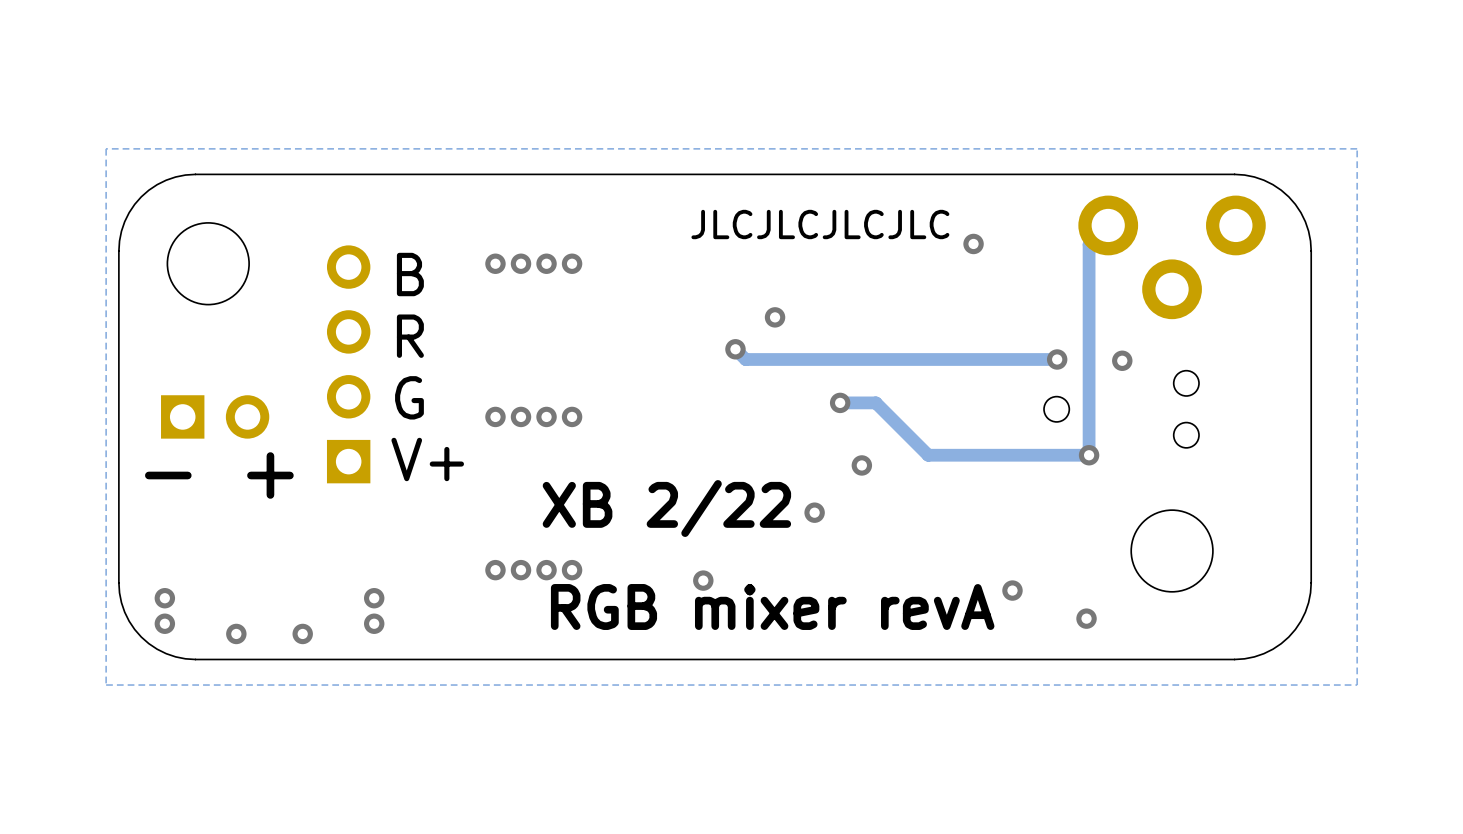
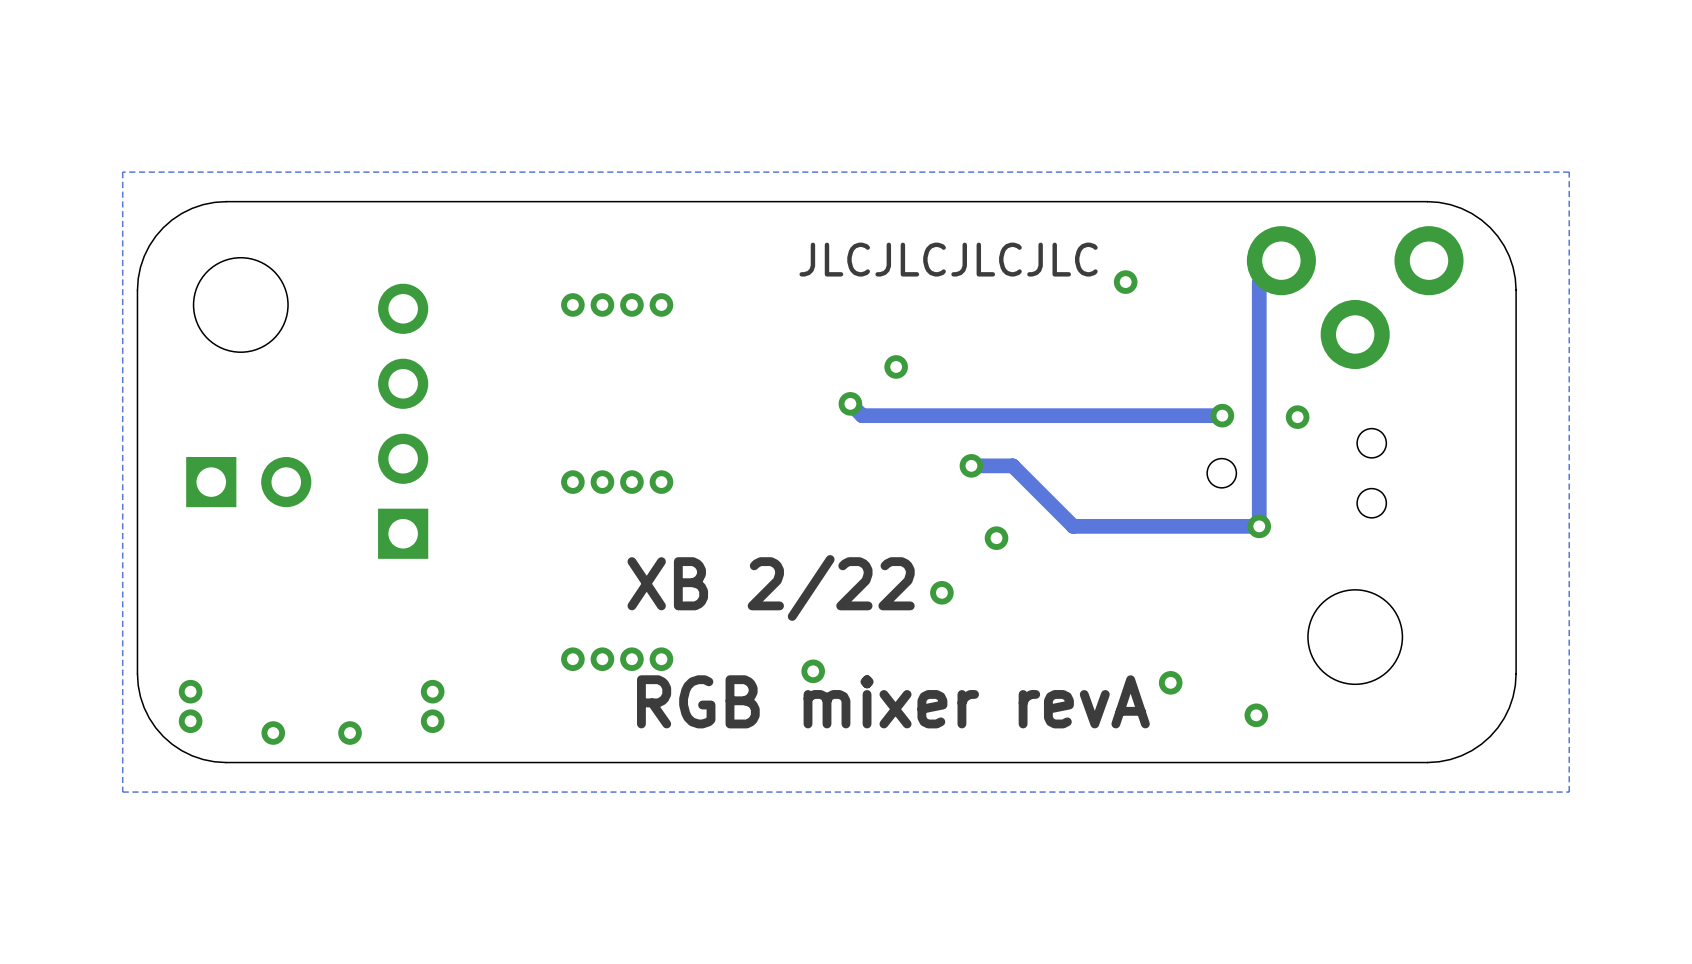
text: B (410, 274) -> none
text: R (410, 336) -> none
text: G (409, 397) -> none
text: V+ (427, 459) -> none
text: - + (219, 475) -> none

